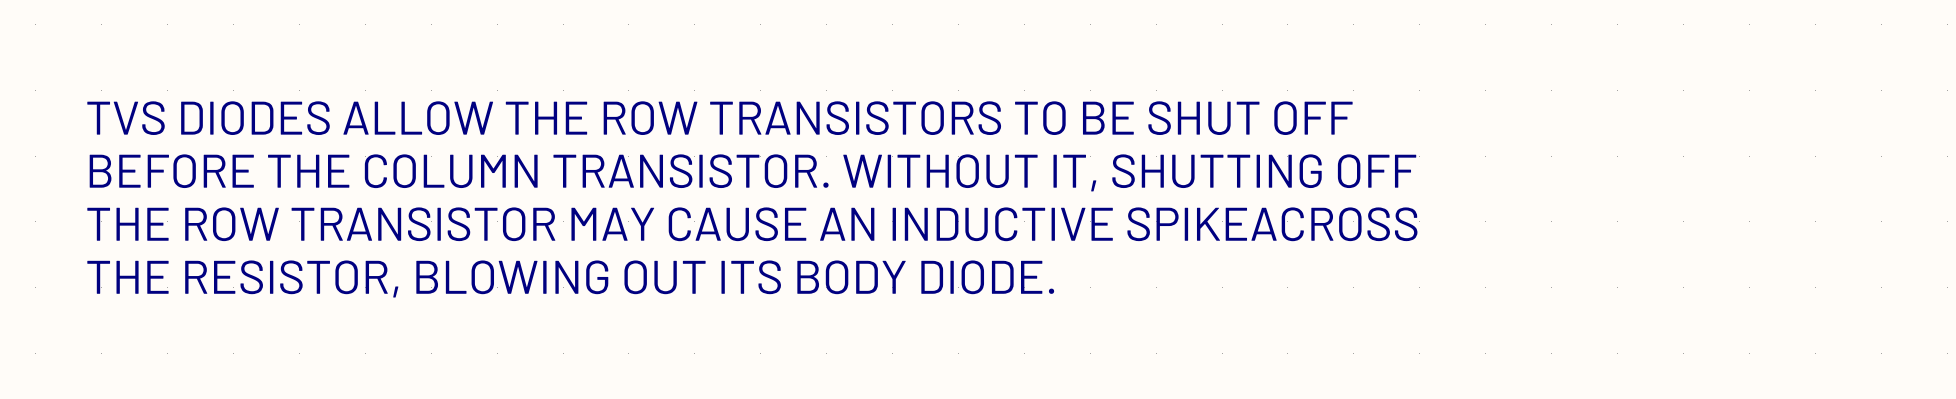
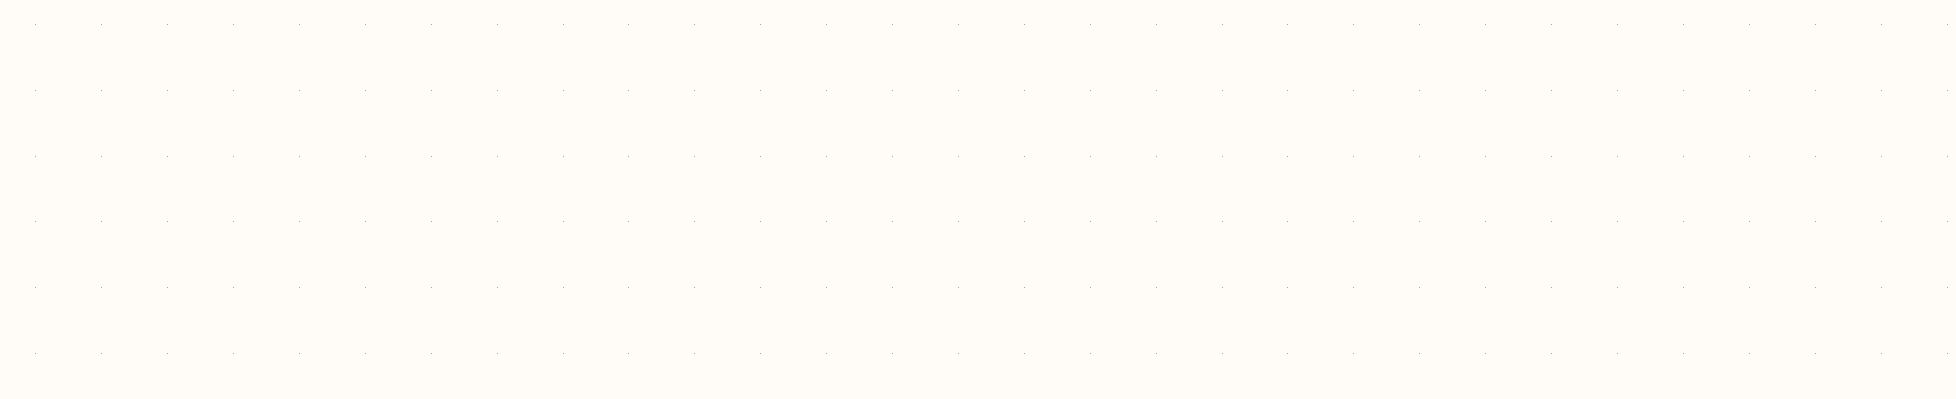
text: TVS DIODES ALLOW THE ROW TRANSISTORS TO BE SHUT OFF (719, 118) -> none
text: BEFORE THE COLUMN TRANSISTOR. WITHOUT IT, SHUTTING OFF (752, 172) -> none
text: THE ROW TRANSISTOR MAY CAUSE AN INDUCTIVE SPIKEACROSS (752, 224) -> none
text: THE RESISTOR, BLOWING OUT ITS BODY DIODE. (570, 278) -> none

